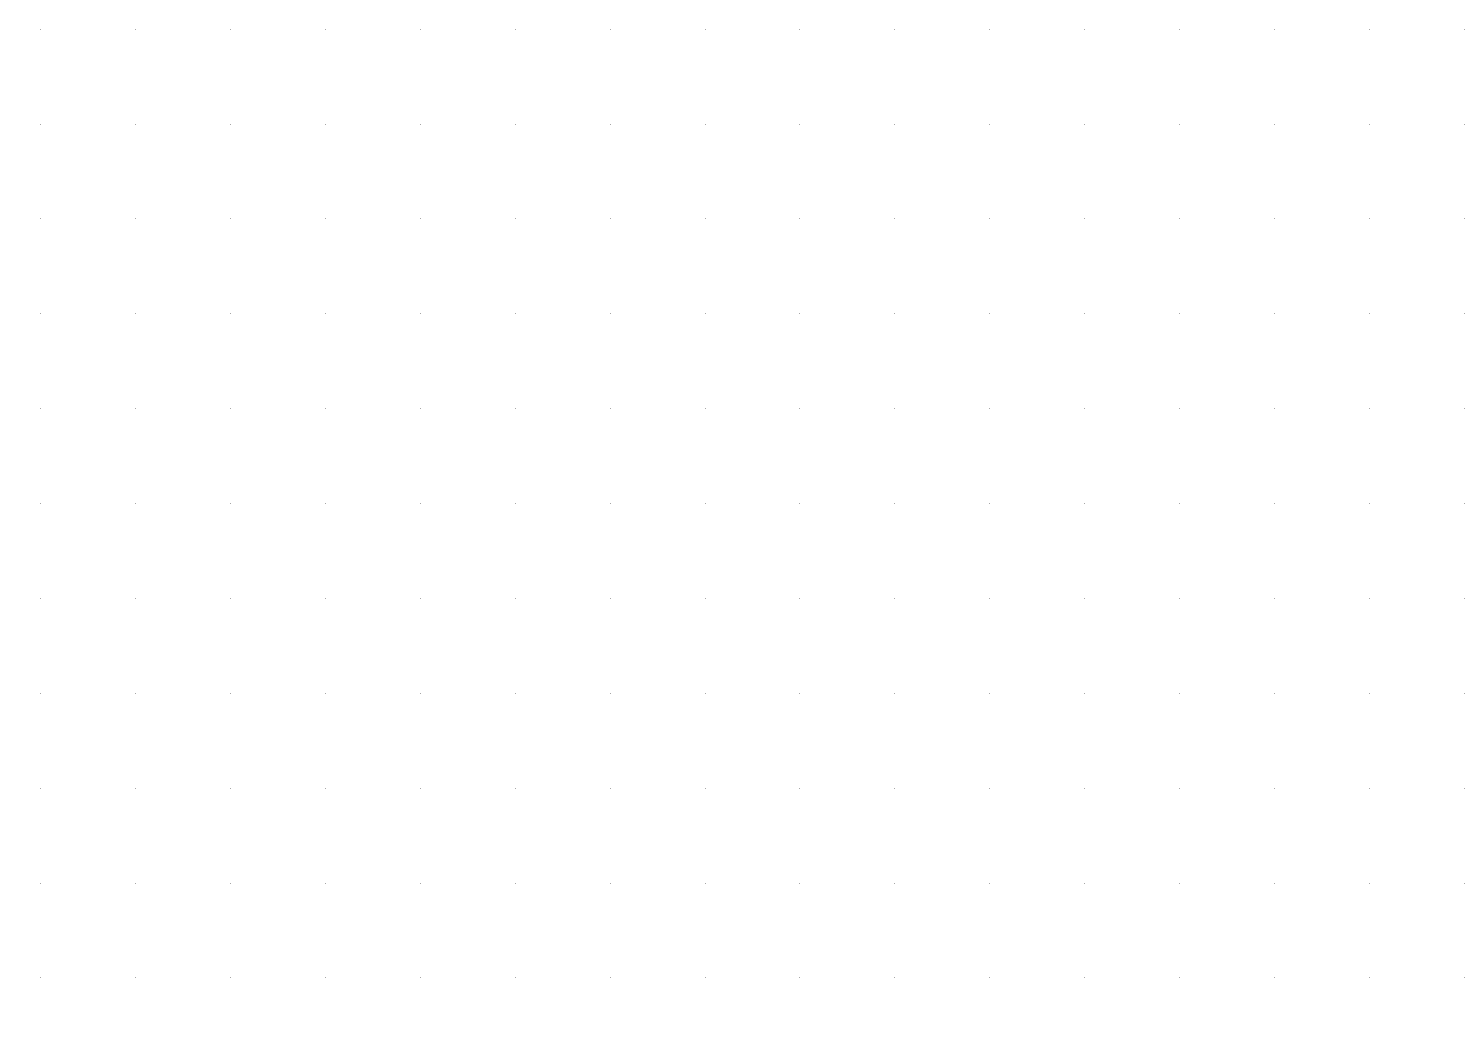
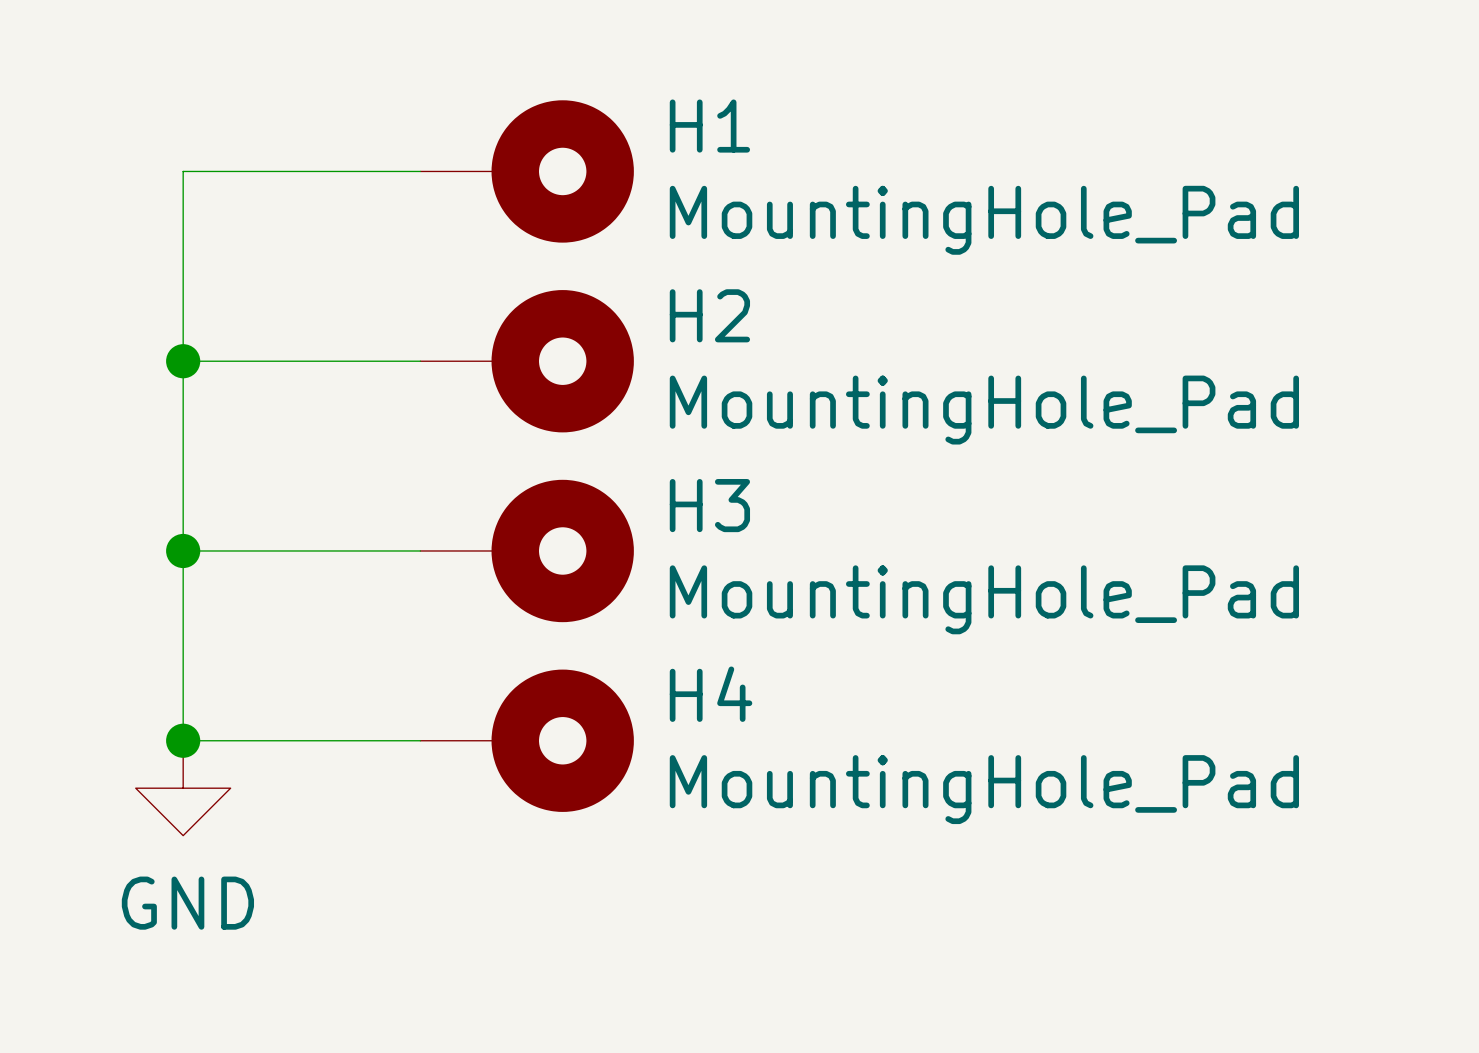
wire: none -> (420, 171) (183, 171) (183, 740) (420, 740)
H1: none -> MountingHole_Pad (527, 171)
wire: none -> (183, 361) (420, 361)
junction: none -> (183, 361)
H2: none -> MountingHole_Pad (527, 361)
wire: none -> (183, 550) (420, 550)
junction: none -> (183, 550)
H3: none -> MountingHole_Pad (527, 550)
junction: none -> (183, 740)
H4: none -> MountingHole_Pad (527, 740)
power symbol: none -> GND (183, 788)

